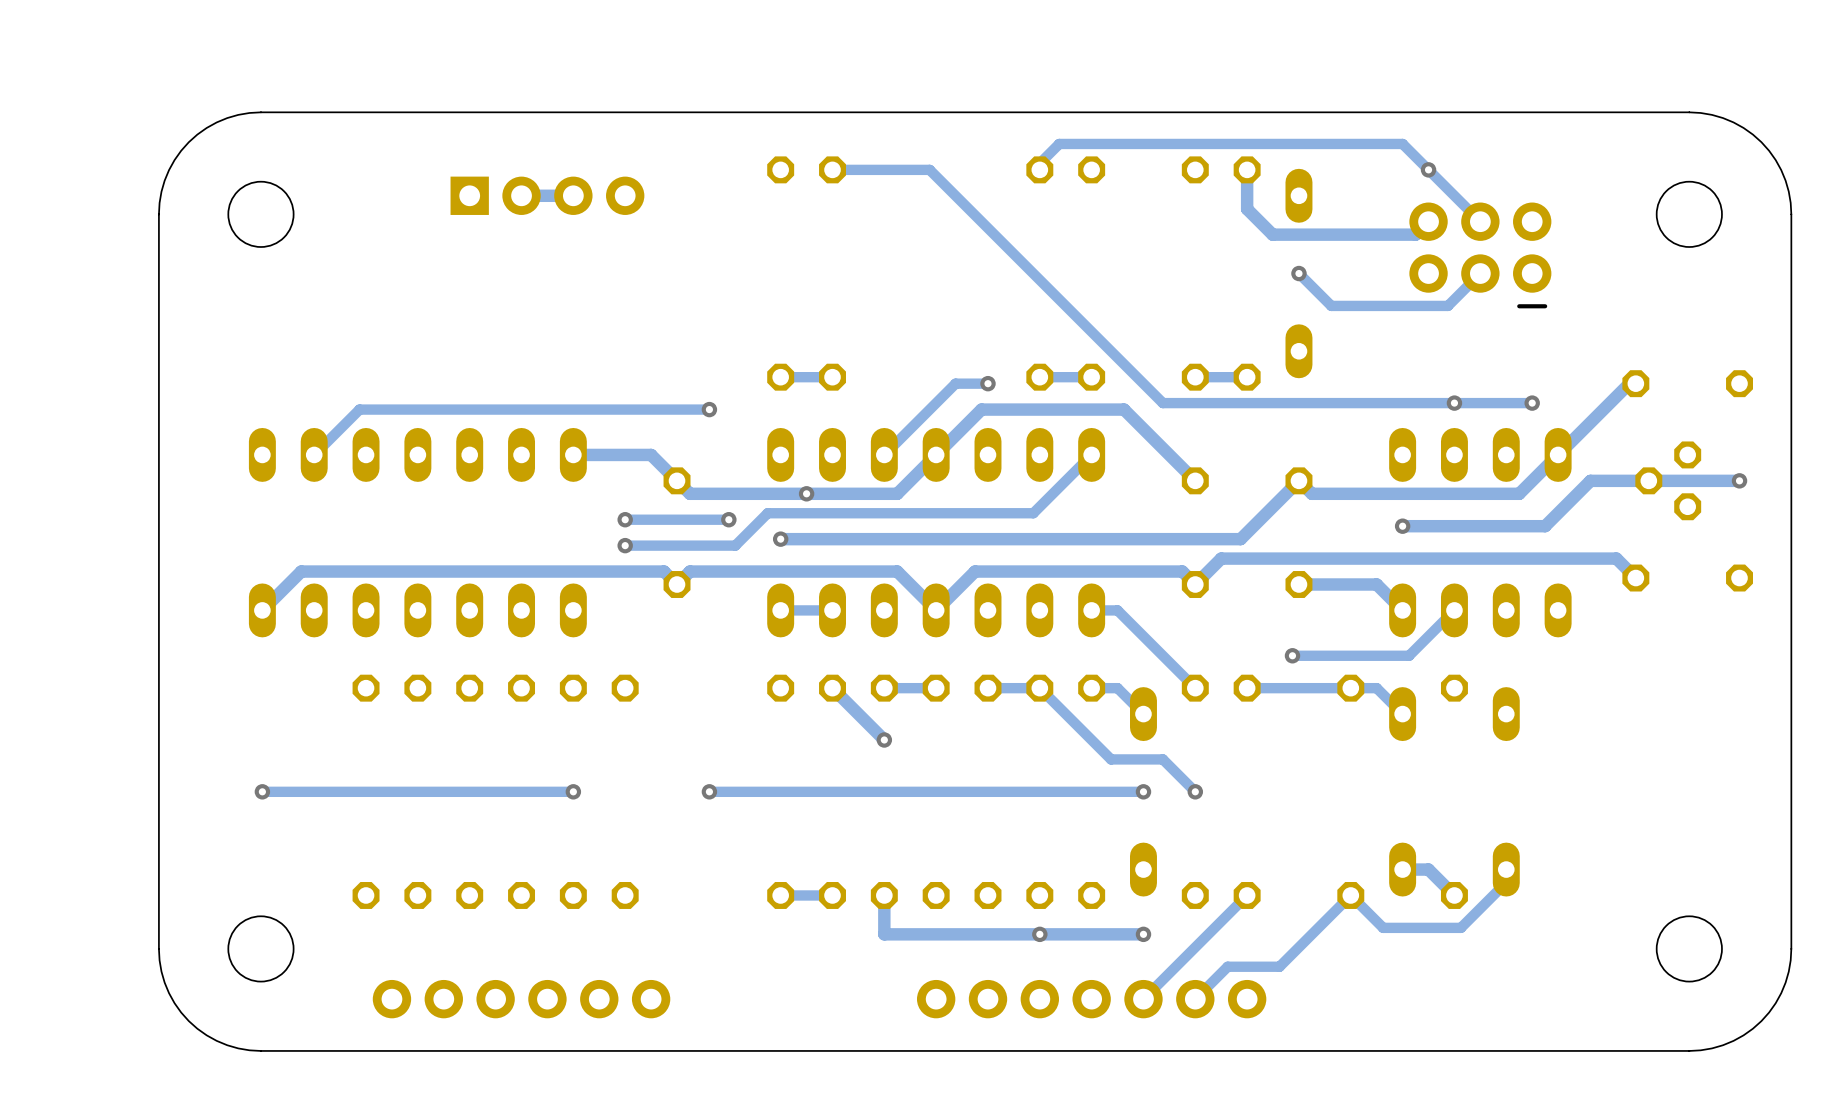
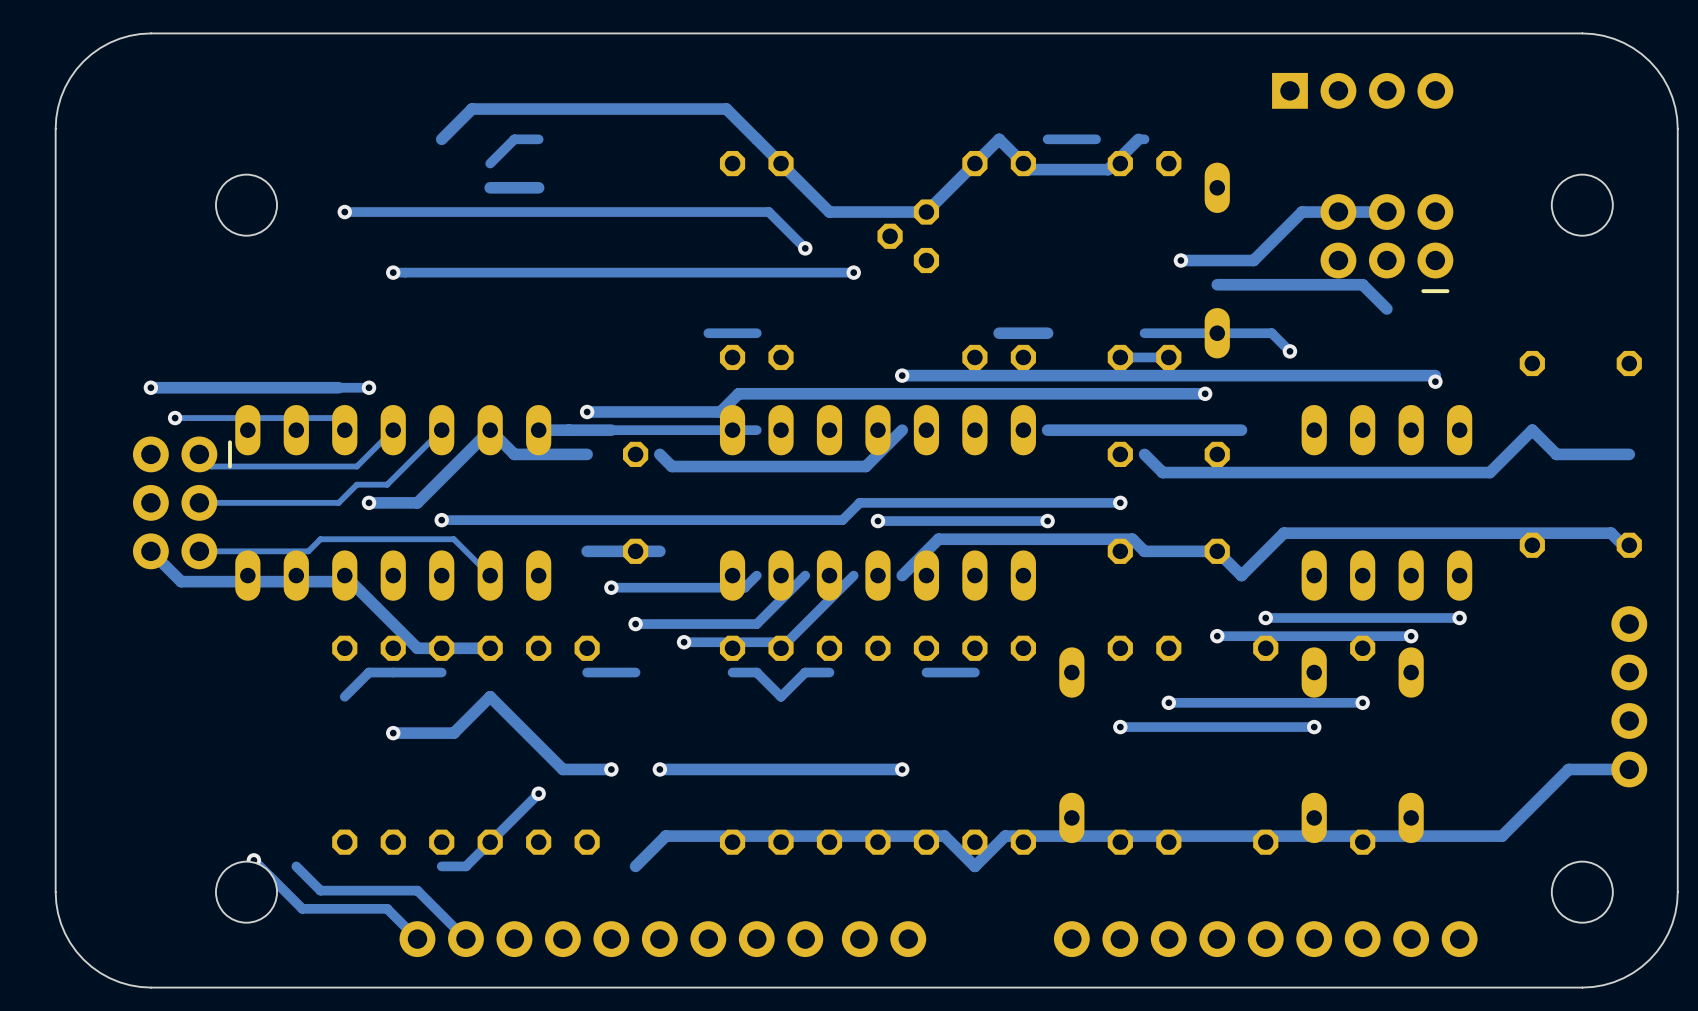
part: none -> (1362, 90)
track: none -> (538, 139) (514, 139) (490, 163)
track: (1117, 143) (1059, 143) (1039, 163) (1039, 169) -> none
track: (1214, 143) (1169, 143) -> (1138, 139) (1108, 169) (1029, 169) (999, 139) (926, 212) (829, 212) (726, 109) (472, 109) (441, 139)
track: (1221, 143) (1402, 143) (1480, 221) -> (1180, 260) (1253, 260) (1302, 212) (1386, 212)
track: (832, 169) (929, 169) (1162, 403) (1532, 403) -> none
track: (1247, 169) (1247, 209) (1272, 234) (1415, 234) (1428, 221) -> none
via: (1428, 169) -> none
part: (547, 195) -> none
board edge: (1791, 214) (1785, 180) (1769, 150) (1743, 127) (1723, 118) (1700, 112) (260, 112) (238, 114) (216, 122) (197, 134) (181, 150) (164, 180) (159, 202) (158, 948) (164, 982) (174, 1003) (188, 1021) (206, 1035) (227, 1045) (260, 1050) -> (1677, 205) (1677, 118) (1668, 87) (1656, 69) (1641, 54) (1613, 38) (1593, 34) (151, 33) (129, 35) (109, 42) (91, 54) (76, 69) (61, 97) (56, 118) (56, 902) (61, 923) (76, 951) (91, 966) (109, 978) (140, 986) (246, 987)
track: none -> (344, 212) (768, 212) (805, 248)
via: none -> (344, 212)
part: none -> (908, 236)
via: none -> (805, 248)
via position: (1298, 273) -> (1180, 260)
track: (1480, 273) (1447, 305) (1331, 305) (1298, 273) -> none
via: none -> (393, 272)
track: none -> (853, 272) (393, 272)
via: none -> (853, 272)
track: none -> (1217, 284) (1362, 284) (1386, 308)
track: none -> (1144, 333) (1271, 333) (1289, 351)
via: none -> (1289, 351)
track: (832, 377) (780, 377) -> (756, 333) (708, 333)
track: (1091, 377) (1039, 377) -> (1047, 333) (999, 333)
track: (987, 383) (955, 383) (884, 454) -> none
via position: (987, 383) -> (902, 375)
track: (1635, 383) (1629, 383) (1519, 493) (1311, 493) (1298, 480) (1240, 539) (780, 539) -> none
track: none -> (1435, 375) (902, 375)
via: (1454, 403) -> none
via: none -> (150, 387)
track: (359, 409) (314, 454) -> (338, 387) (150, 387)
via: none -> (369, 387)
track: (709, 409) (391, 409) -> none
via: (709, 409) -> none
track: none -> (1205, 393) (738, 393) (720, 411) (587, 411)
via: none -> (1205, 393)
via: none -> (587, 411)
track: none -> (175, 418) (332, 418) (344, 430)
via: none -> (175, 418)
track: none -> (393, 430) (356, 466) (211, 466) (199, 454)
track: none -> (441, 430) (387, 484) (356, 484) (338, 502) (199, 502)
track: (651, 454) (689, 493) (715, 493) -> (659, 454) (671, 466)
track: none -> (756, 430) (611, 430)
track: (1091, 454) (1033, 513) (767, 513) (735, 545) (625, 545) -> none
track: none -> (1241, 430) (1047, 430)
track: none -> (587, 454) (514, 454) (490, 430) (417, 502) (369, 502)
track: (1195, 480) (1124, 409) (981, 409) (897, 493) -> (902, 430) (865, 466) (841, 466)
track: (1661, 480) (1590, 480) (1545, 526) (1402, 526) -> (1556, 454) (1532, 430) (1489, 472) (1162, 472) (1144, 454)
part: (1668, 480) -> none
via: (1739, 480) -> none
via: (806, 493) -> none
via: (625, 519) -> none
track: (728, 519) (625, 519) -> none
via: (728, 519) -> none
via: (1402, 526) -> none
part: none -> (182, 502)
via: none -> (369, 502)
track: none -> (1120, 502) (859, 502) (842, 520) (441, 520)
via: none -> (1120, 502)
via: (780, 539) -> none
via: (625, 545) -> none
via: none -> (441, 520)
via: none -> (877, 521)
track: none -> (1047, 521) (877, 521)
via: none -> (1047, 521)
track: (340, 571) (301, 571) (262, 610) -> (320, 539) (308, 551) (199, 551)
track width: thick (482, 571) (340, 571) -> thin (453, 539) (320, 539)
track: (1000, 571) (975, 571) (936, 610) (897, 571) (689, 571) (677, 584) (664, 571) (482, 571) -> (490, 575) (453, 539)
track: none -> (938, 539) (902, 575)
track: (1182, 571) (1195, 584) (1221, 558) (1616, 558) (1635, 578) -> (1108, 539) (1132, 539) (1144, 551) (1217, 551) (1241, 575) (1283, 533) (1611, 533) (1629, 551)
track: none -> (150, 551) (181, 581) (338, 581) (344, 575) (417, 648) (490, 648)
track: none -> (659, 551) (587, 551)
track: (1298, 584) (1376, 584) (1402, 610) -> none
track: none -> (756, 575) (744, 587) (611, 587)
track: (832, 610) (780, 610) -> (635, 672) (587, 672)
track: none -> (805, 575) (756, 624) (635, 624)
track: none -> (853, 575) (787, 642) (684, 642)
track: (1091, 610) (1117, 610) (1195, 688) -> none
track: (1454, 610) (1409, 655) -> (1459, 617) (1320, 617)
via: none -> (611, 587)
via position: (1292, 655) -> (1217, 636)
track: (1350, 655) (1292, 655) -> none
via: none -> (1265, 617)
via: none -> (1459, 617)
via: none -> (635, 624)
track: none -> (1411, 636) (1217, 636)
via: none -> (1411, 636)
via: none -> (684, 642)
track: (832, 688) (884, 739) -> none
track: (936, 688) (884, 688) -> (974, 672) (926, 672)
track: (987, 688) (1039, 688) (1111, 759) (1162, 759) (1195, 791) -> none
track: (1091, 688) (1117, 688) (1143, 714) -> none
track: (1247, 688) (1376, 688) (1402, 714) -> none
track: none -> (441, 672) (369, 672) (344, 696)
track: none -> (829, 672) (805, 672) (781, 696) (756, 672) (732, 672)
via: (884, 739) -> none
part: none -> (1629, 696)
via: none -> (1168, 702)
track: none -> (1362, 702) (1168, 702)
via: none -> (1362, 702)
track: none -> (1314, 727) (1120, 727)
via: none -> (1314, 727)
track: none -> (393, 733) (453, 733) (490, 696) (562, 769) (611, 769)
via: none -> (393, 733)
via: (262, 791) -> none
track: (573, 791) (262, 791) -> none
via: (573, 791) -> none
via position: (709, 791) -> (659, 769)
track: (1143, 791) (709, 791) -> none
via: (1143, 791) -> none
via position: (1195, 791) -> (1120, 727)
via: none -> (611, 769)
track: none -> (902, 769) (659, 769)
via: none -> (902, 769)
track: none -> (1629, 769) (1568, 769) (1502, 836) (1005, 836) (974, 866) (944, 836) (787, 836) (781, 842) (774, 836) (665, 836) (635, 866)
track: none -> (538, 793) (465, 866) (441, 866)
via: none -> (538, 793)
track: (1402, 869) (1428, 869) (1454, 895) -> none
track: (1506, 869) (1506, 882) (1460, 927) (1383, 927) (1350, 895) (1279, 966) (1227, 966) (1195, 999) -> none
track: (832, 895) (780, 895) -> none
track: (884, 895) (884, 934) (1143, 934) -> none
track: (1247, 895) (1143, 999) -> none
track: none -> (253, 860) (302, 908) (387, 908) (417, 939)
via: none -> (253, 860)
track: none -> (296, 866) (320, 890) (417, 890) (465, 939)
via: (1039, 934) -> none
via: (1143, 934) -> none
part: (391, 999) -> none
part: none -> (805, 939)
part: none -> (884, 939)
part position: (987, 999) -> (708, 939)
part: (1091, 999) -> none
part: none -> (1217, 939)
part: none -> (1265, 939)
part: none -> (1314, 939)
part: none -> (1362, 939)
part: none -> (1411, 939)
part: none -> (1459, 939)

